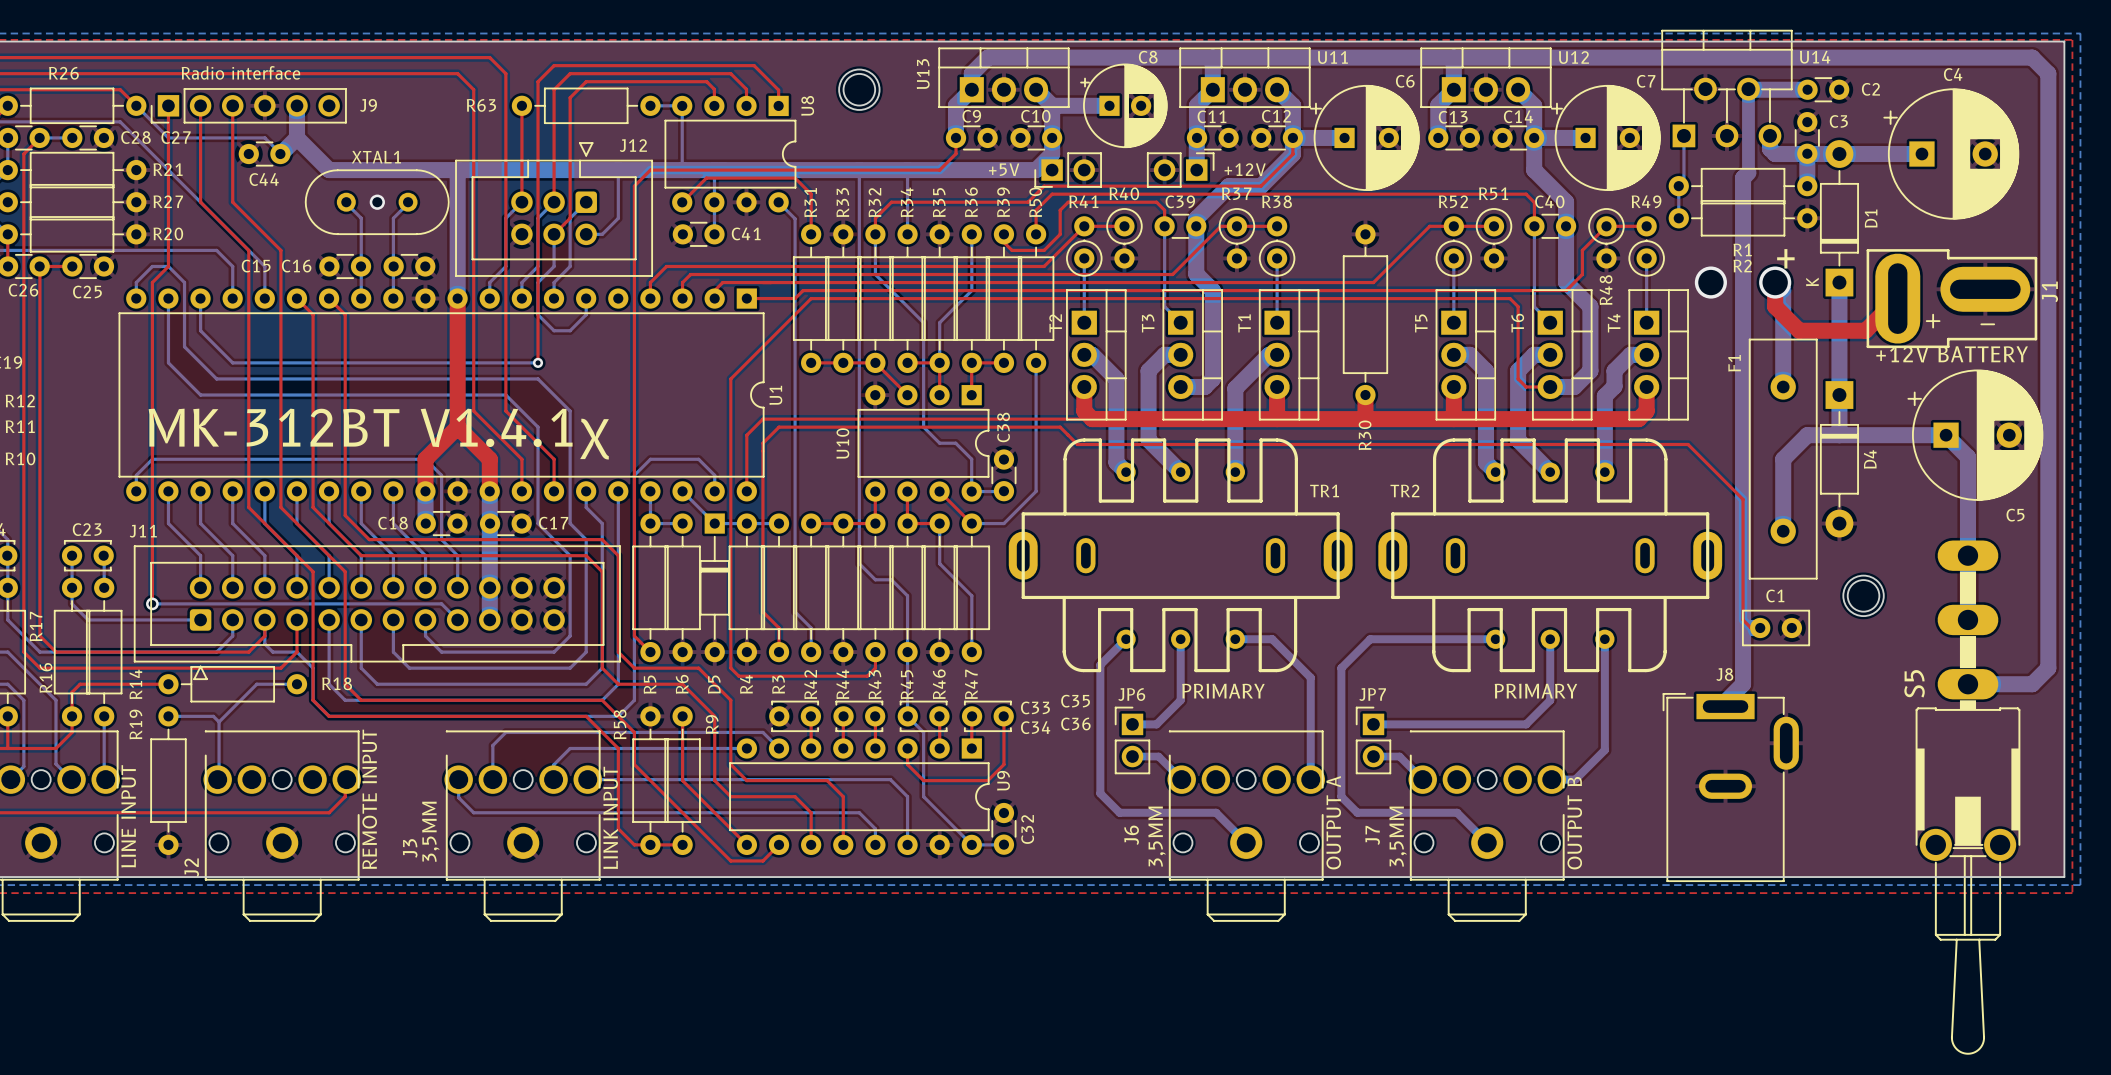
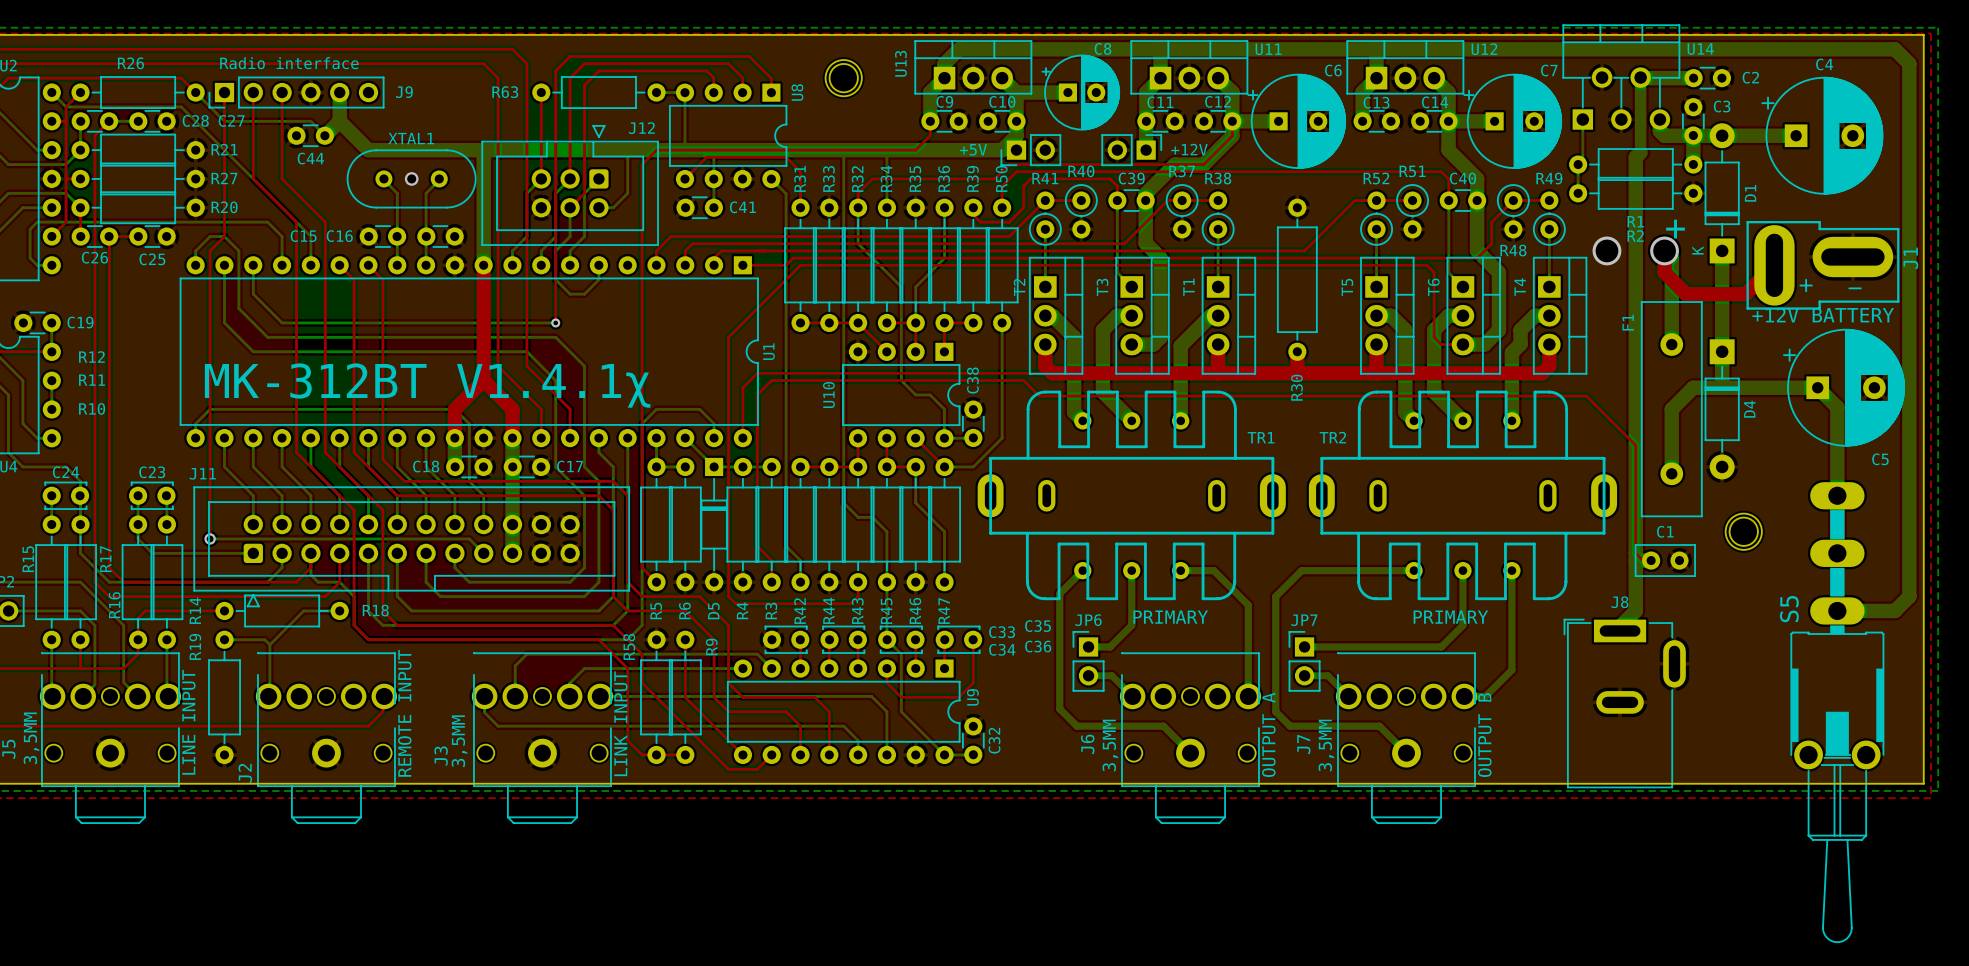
R48 name rotation: 0° (1606, 290) -> 90° clockwise (1513, 250)

